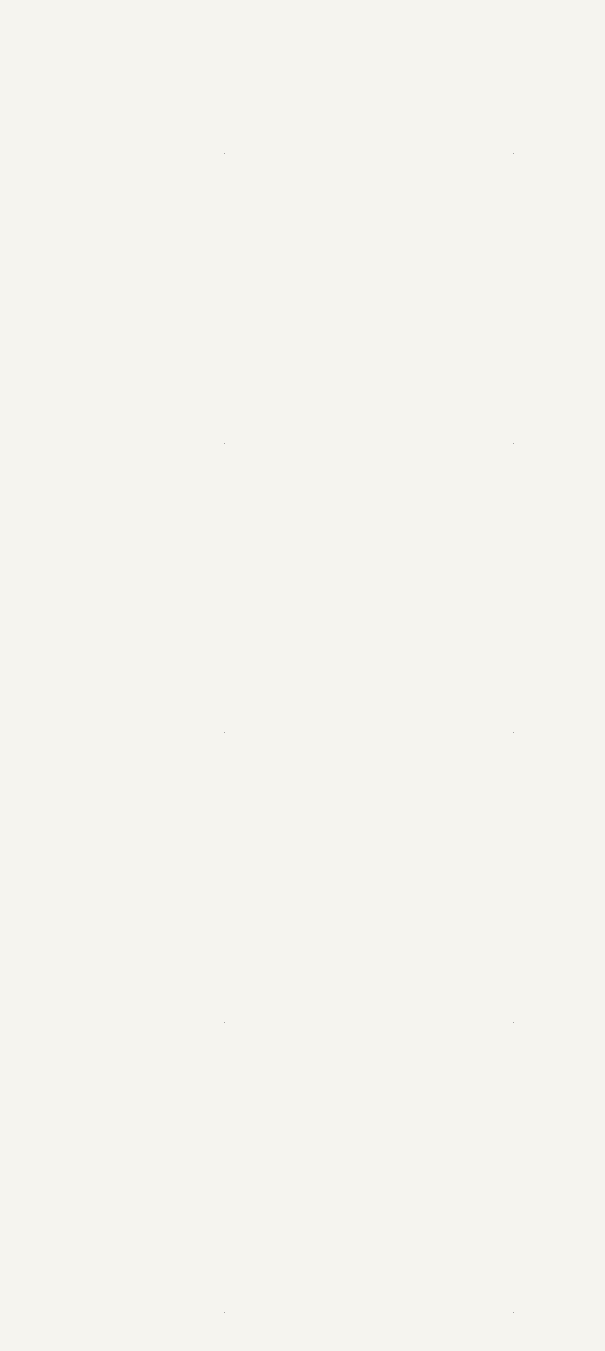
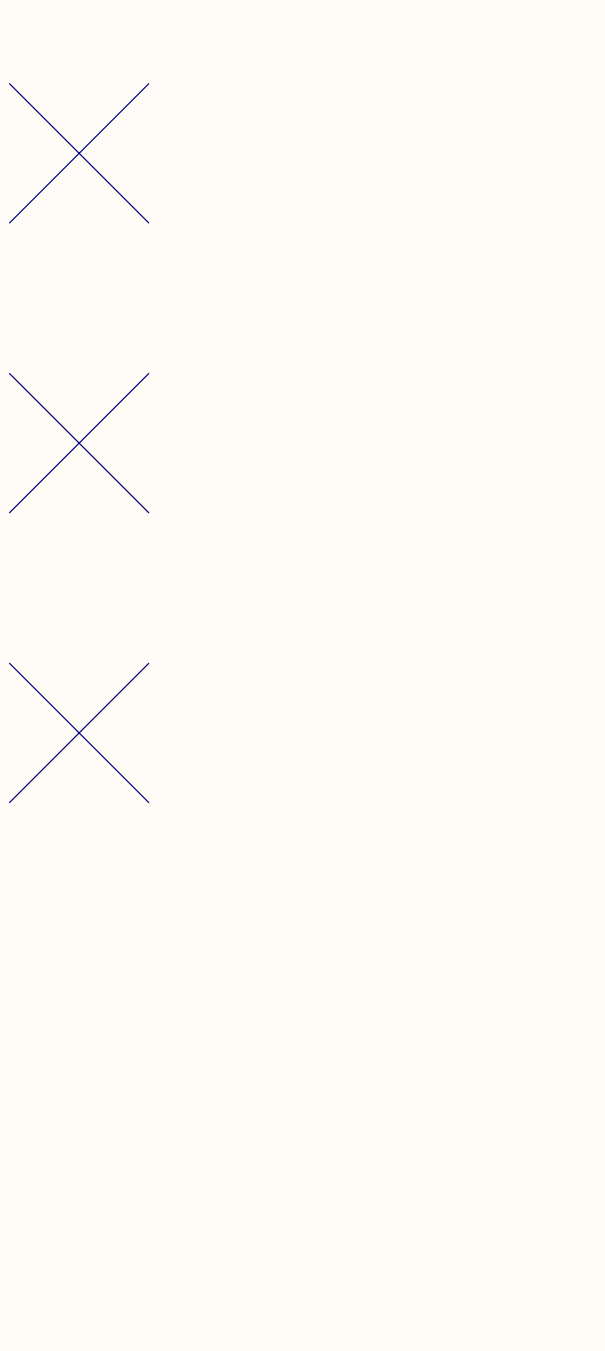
no-connect mark: none -> (79, 153)
no-connect mark: none -> (79, 443)
no-connect mark: none -> (79, 732)

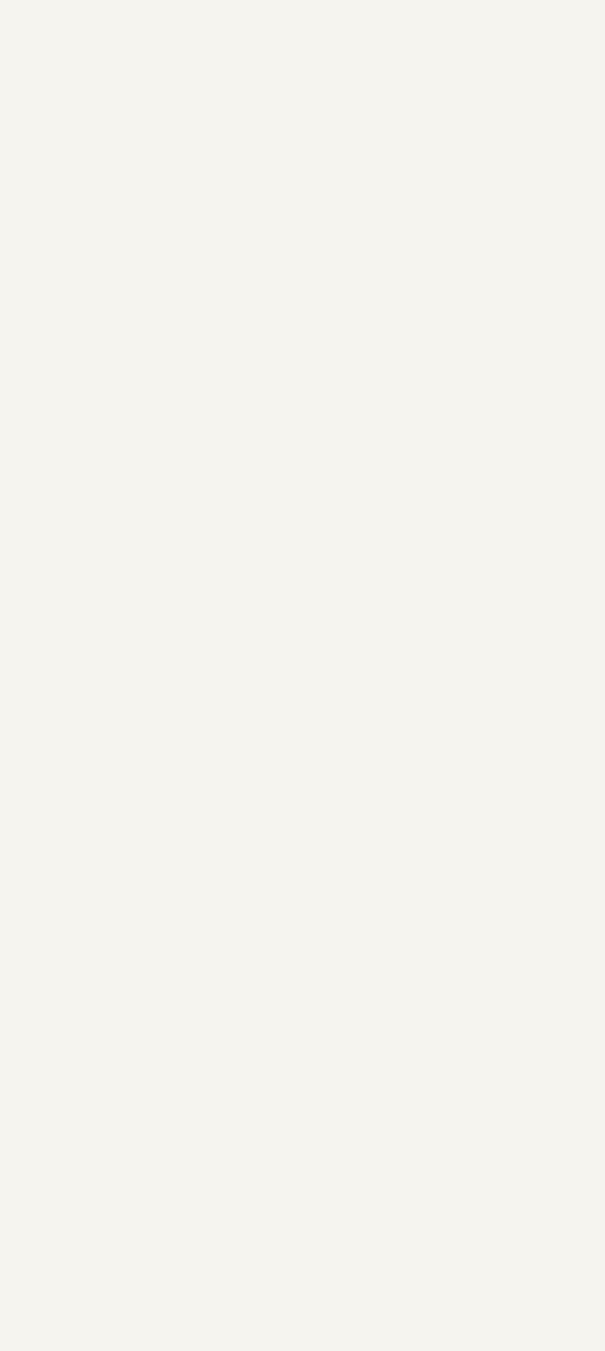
no-connect mark: (79, 153) -> none
no-connect mark: (79, 443) -> none
no-connect mark: (79, 732) -> none

